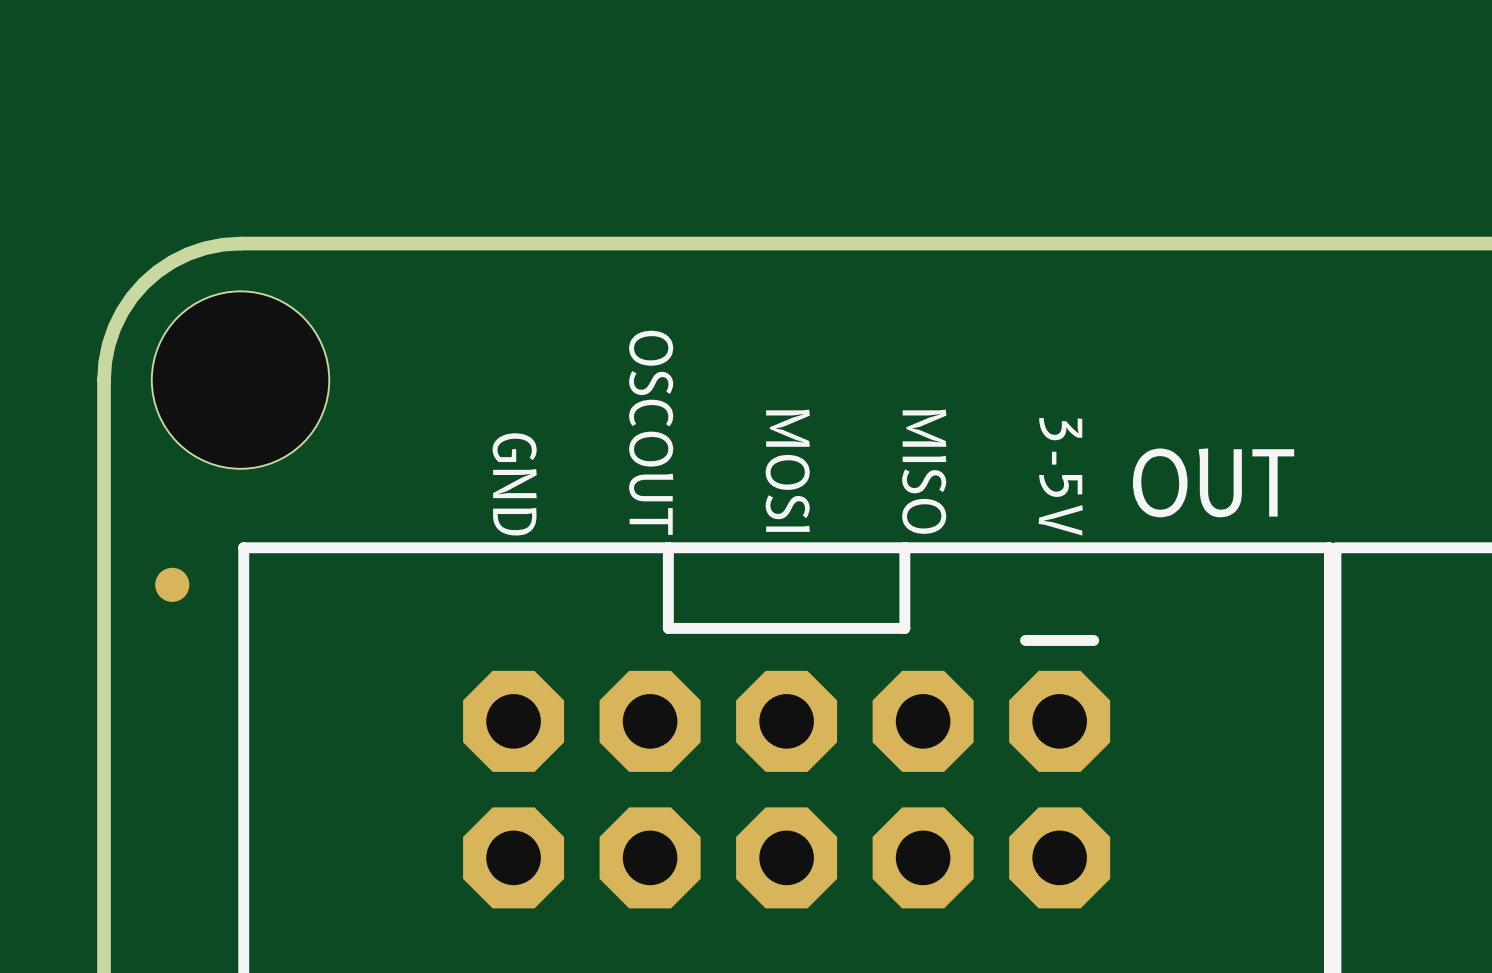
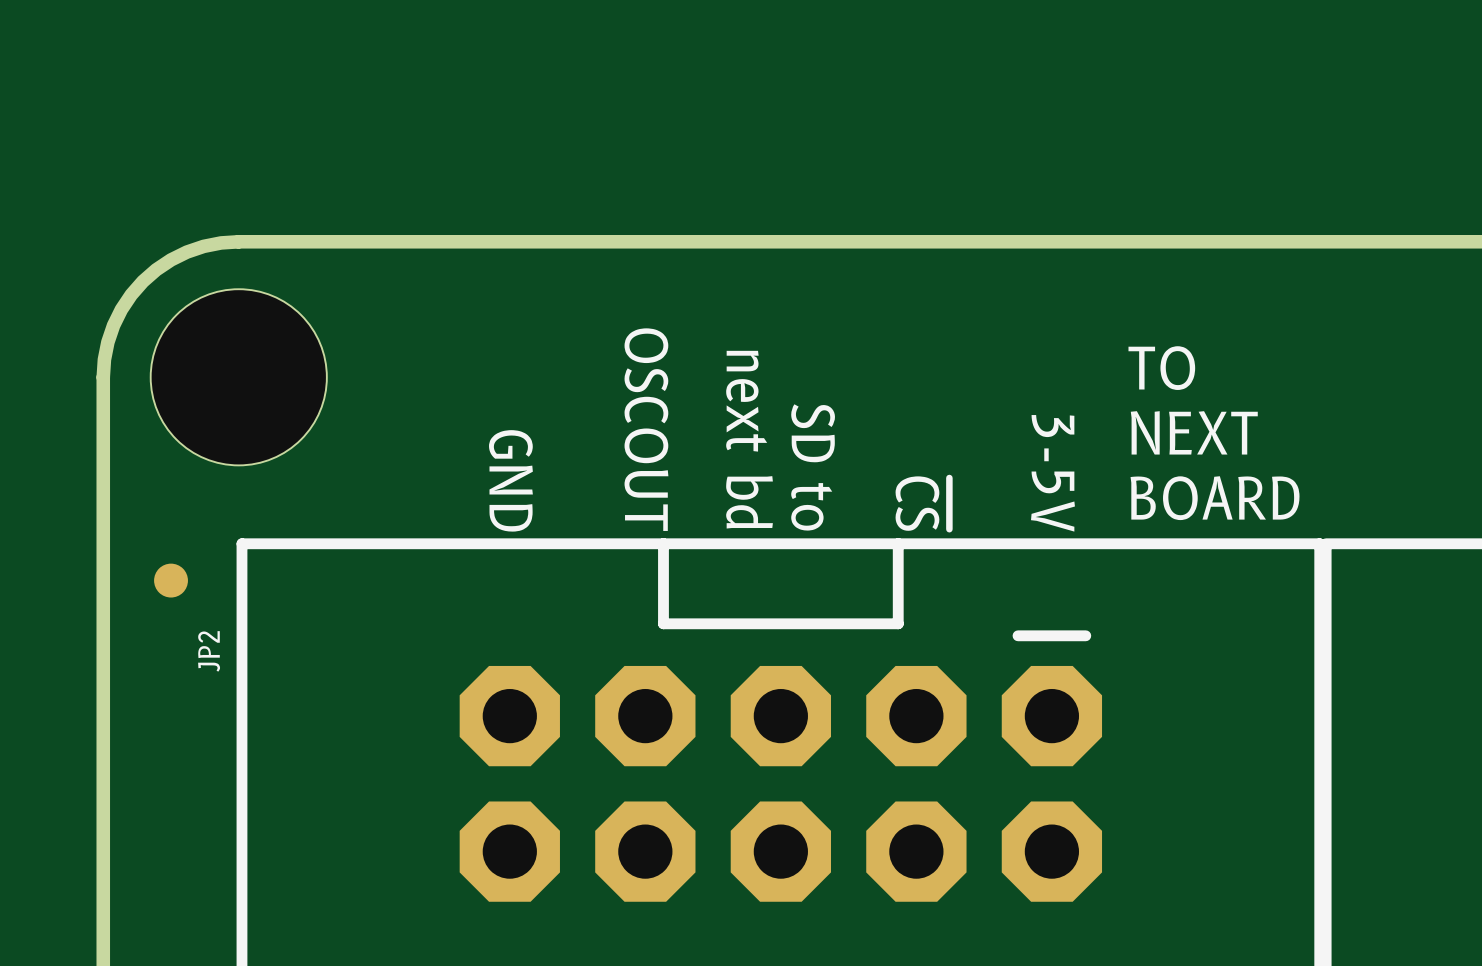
text: none -> TO (1161, 368)
text: none -> NEXT (1194, 432)
text: none -> next bd (749, 439)
text: MOSI (787, 470) -> none
text: none -> SD to (813, 467)
text: MISO (924, 471) -> ~{CS} (922, 503)
text: OUT (1213, 482) -> BOARD (1215, 498)
JP2 name: none -> JP2 (209, 651)

